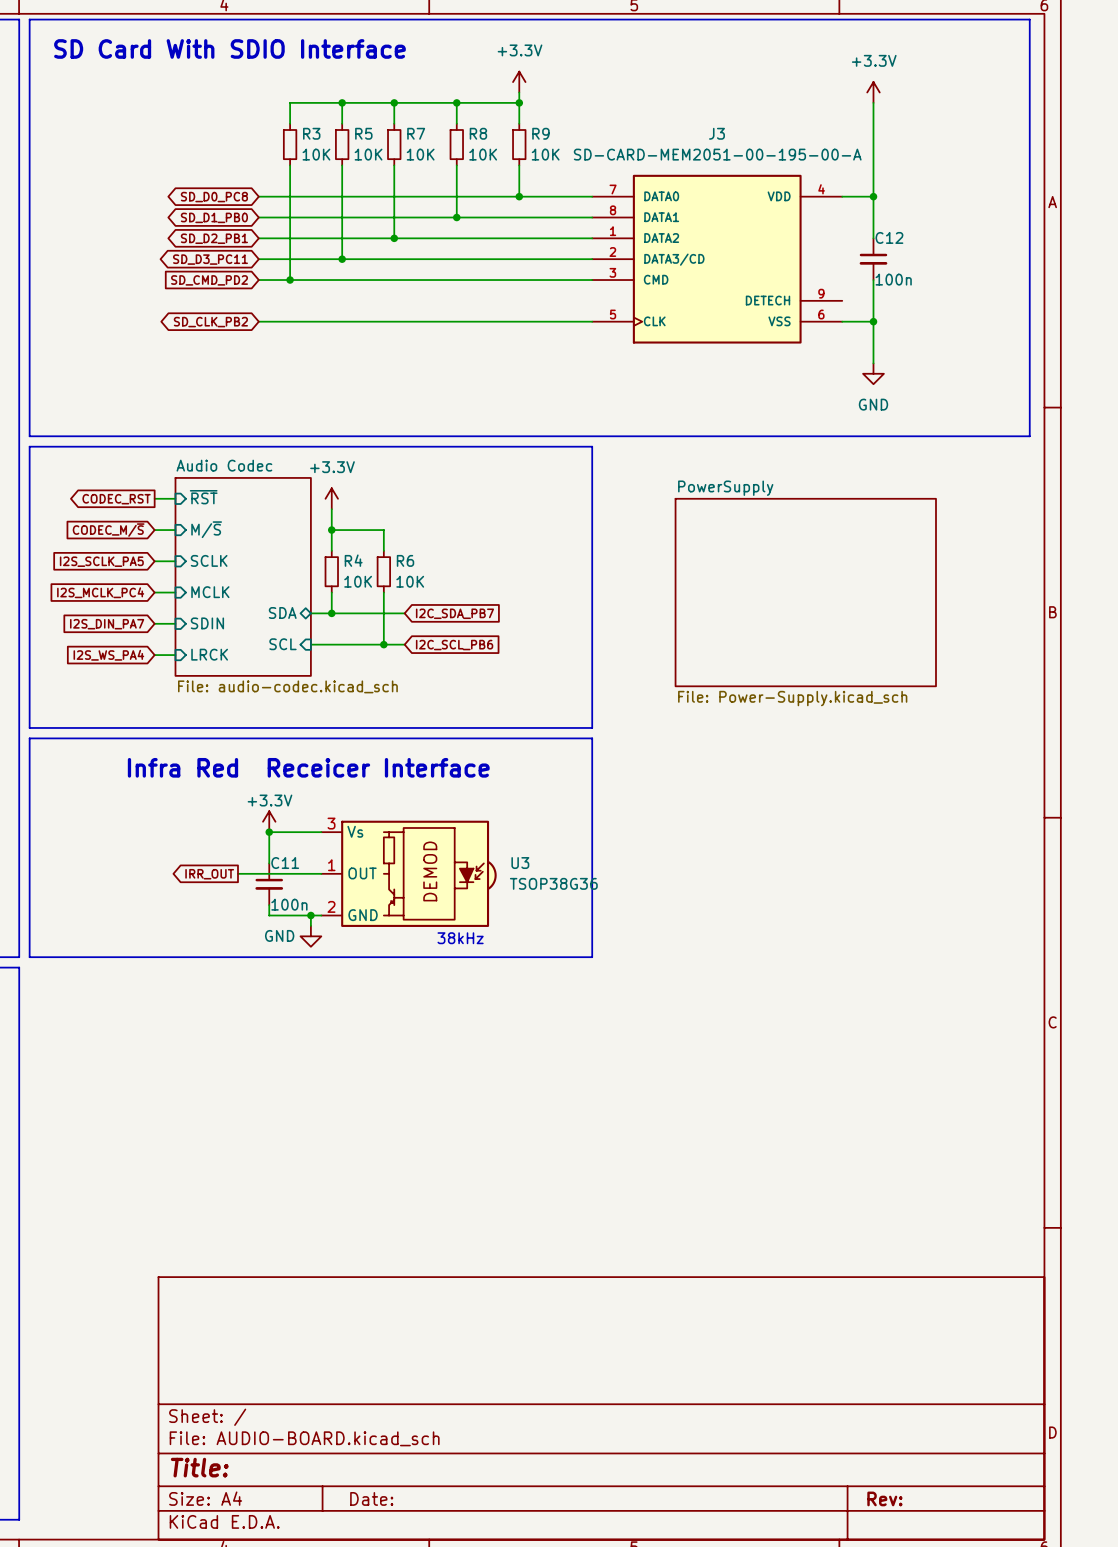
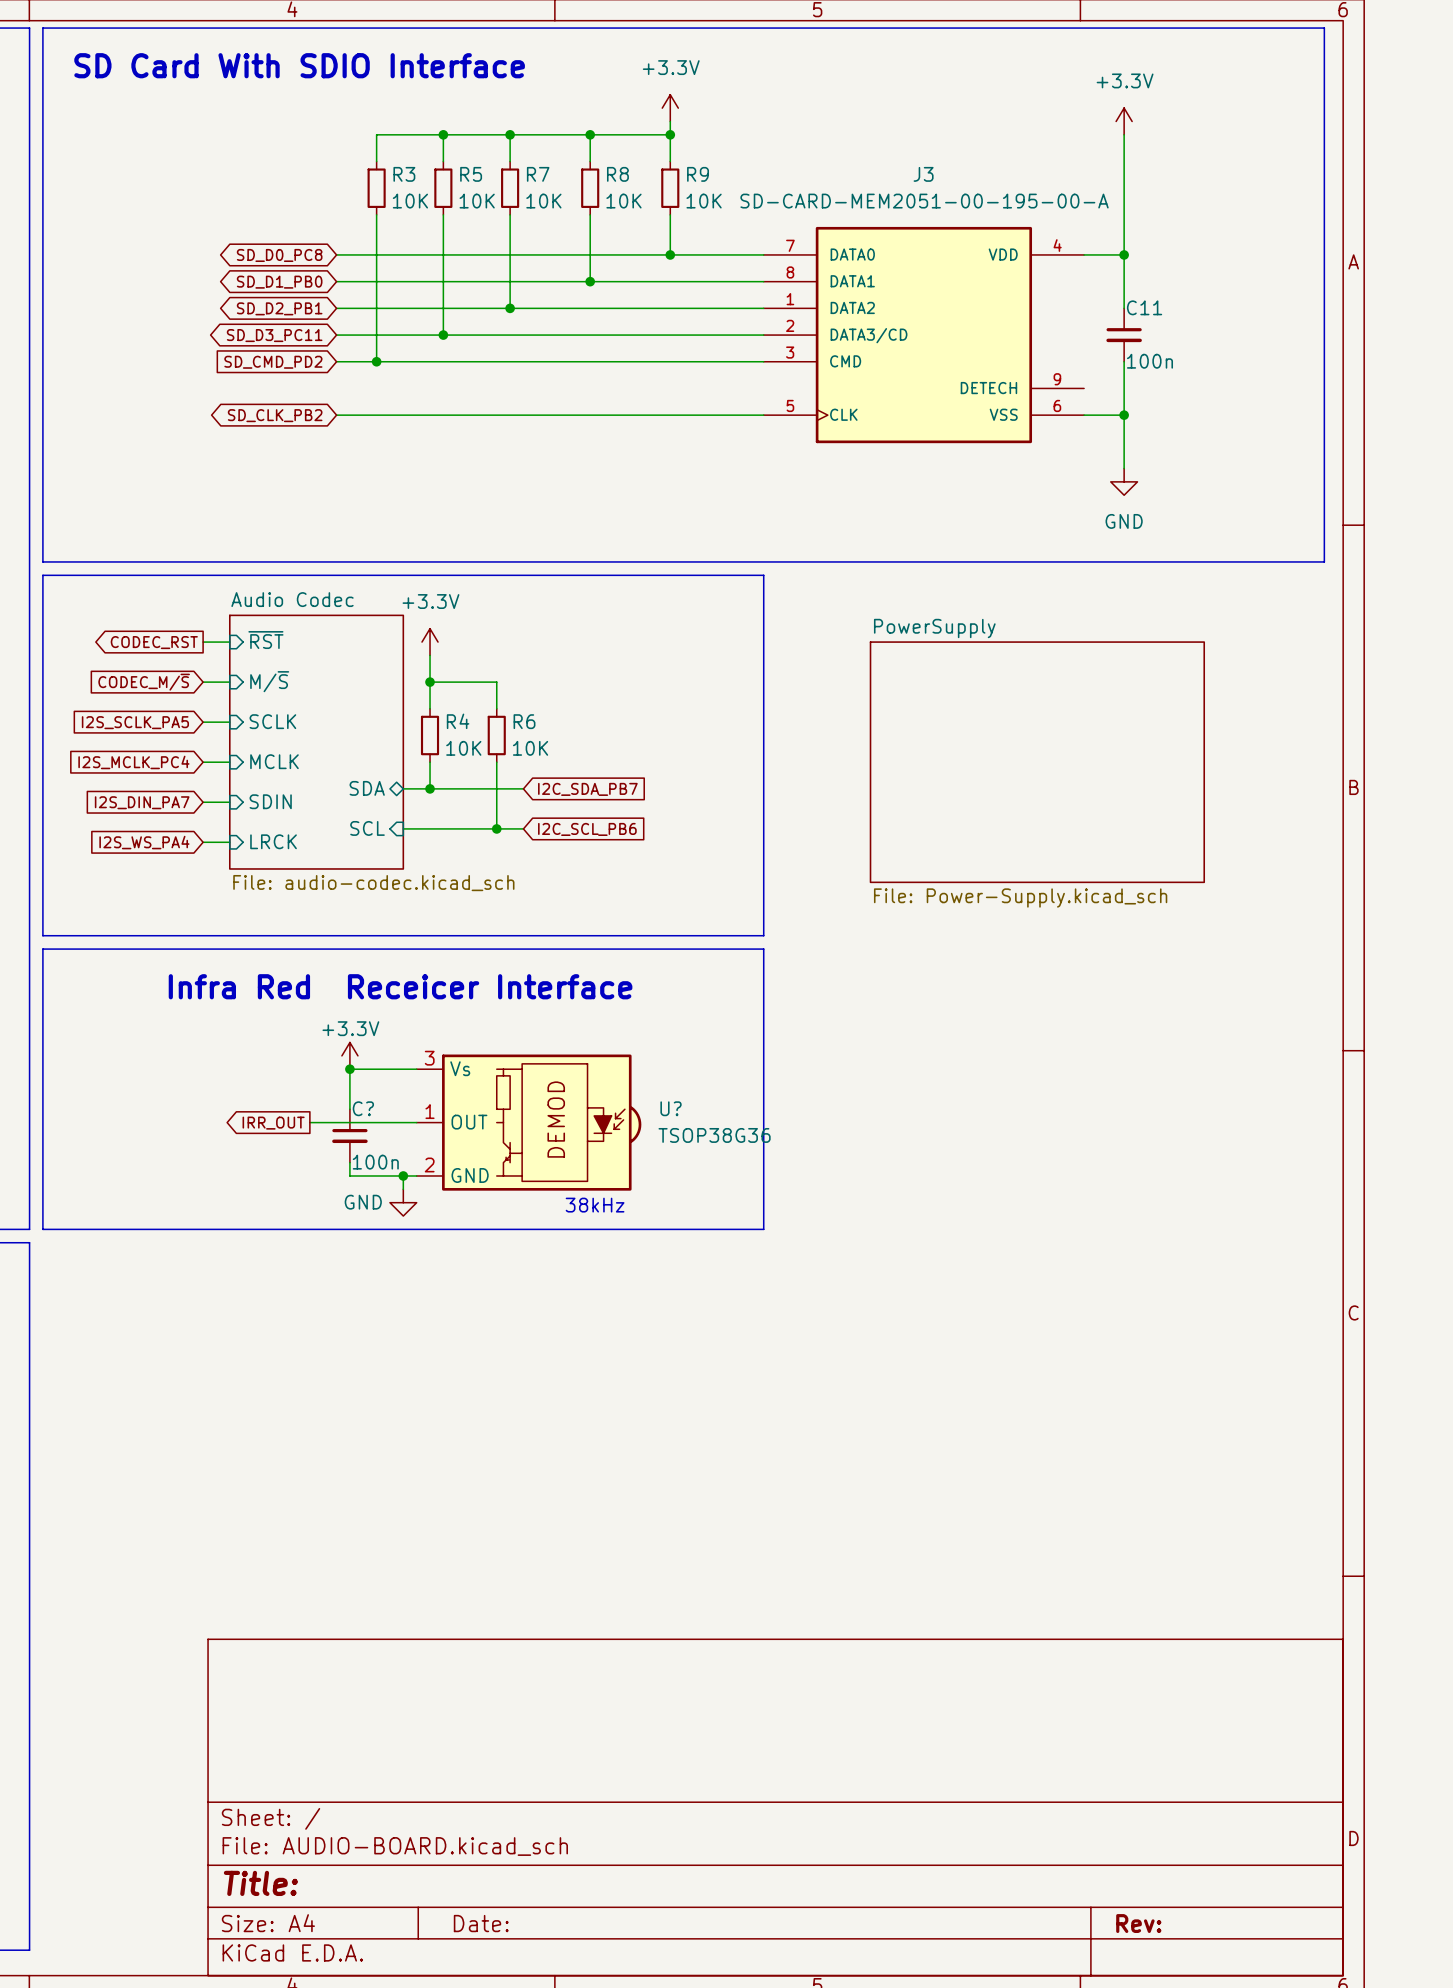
C12 name: C12 (889, 237) -> C11 (1144, 307)
C11 name: C11 (285, 863) -> C? (363, 1108)
U3 name: U3 (520, 863) -> U? (671, 1108)

